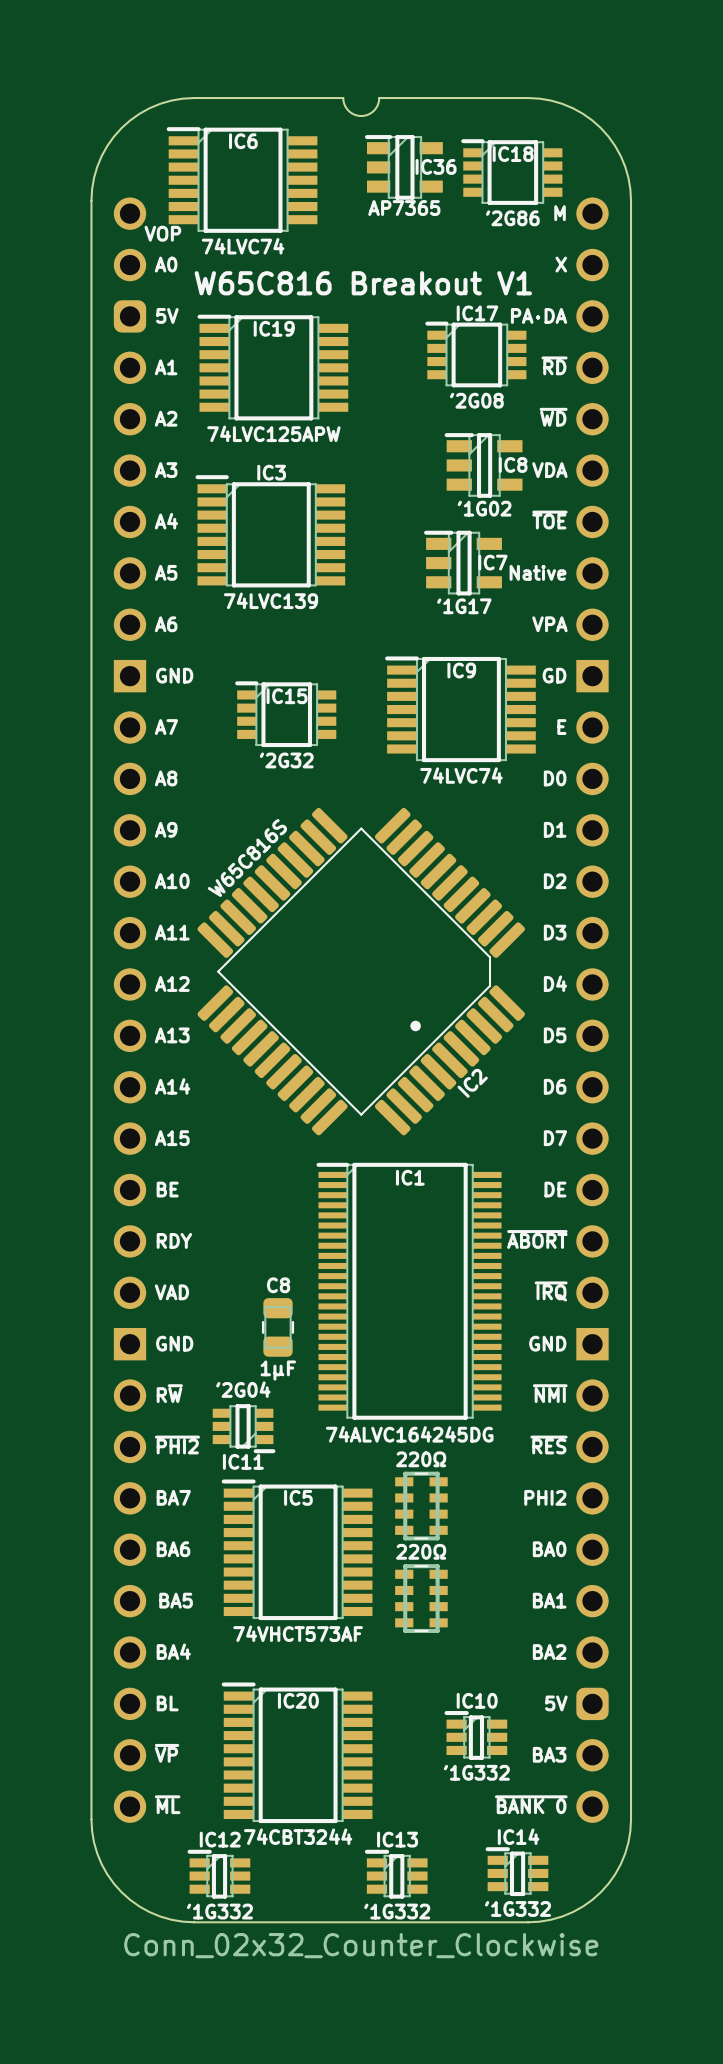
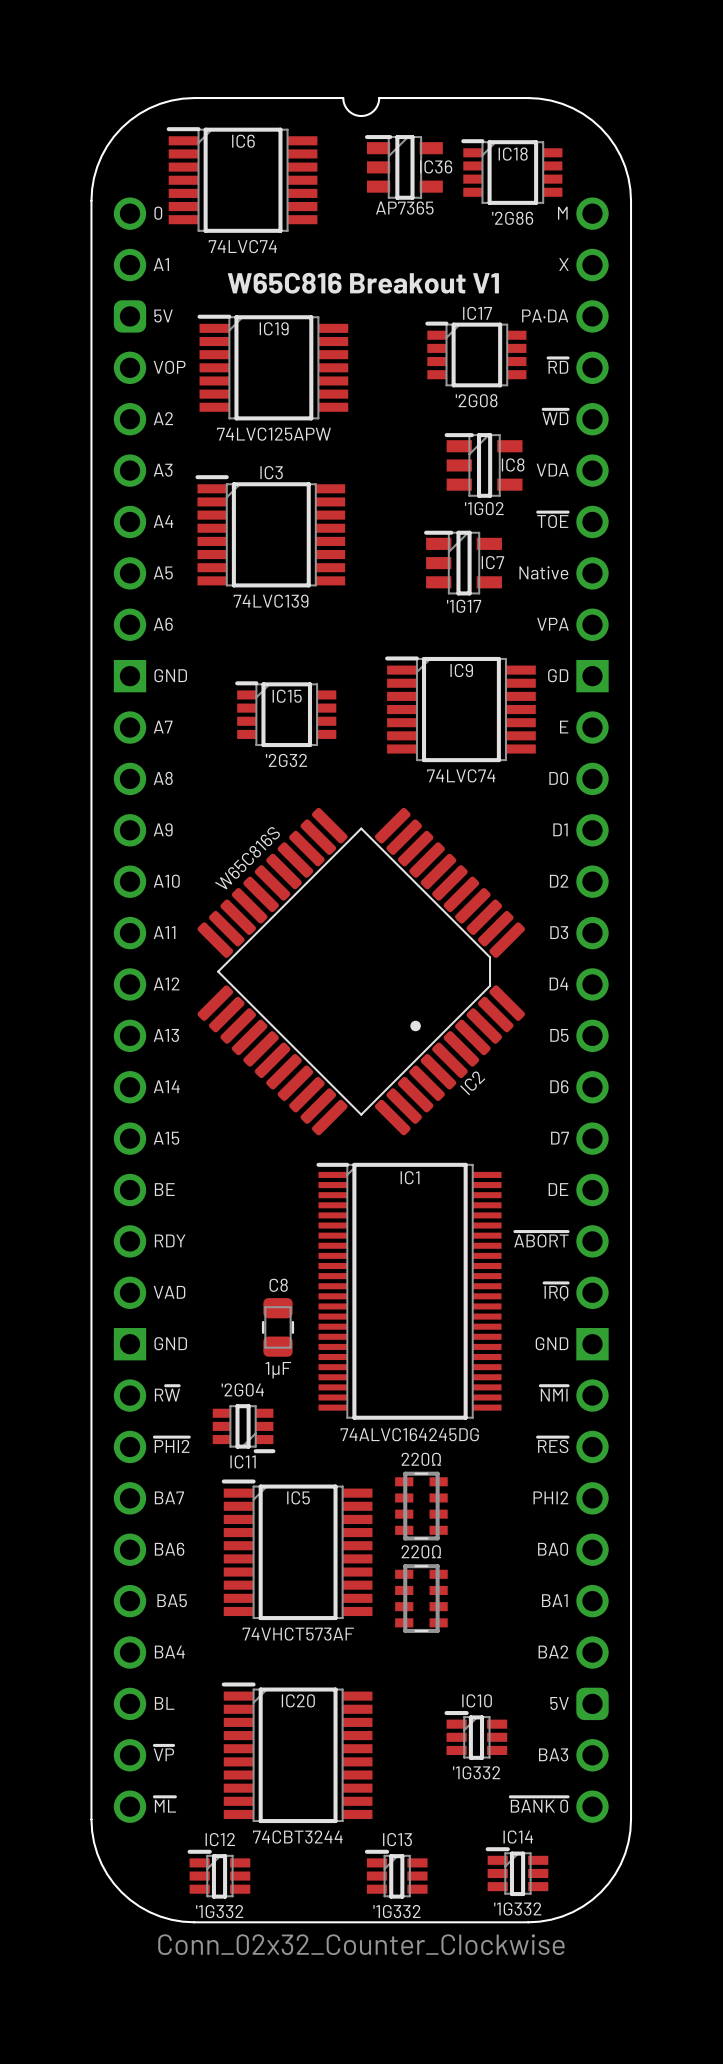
text: none -> 0 (158, 213)
text: VOP (162, 233) -> none
text: A0 (166, 264) -> A1 (161, 264)
text: A1 (166, 367) -> VOP (169, 367)

